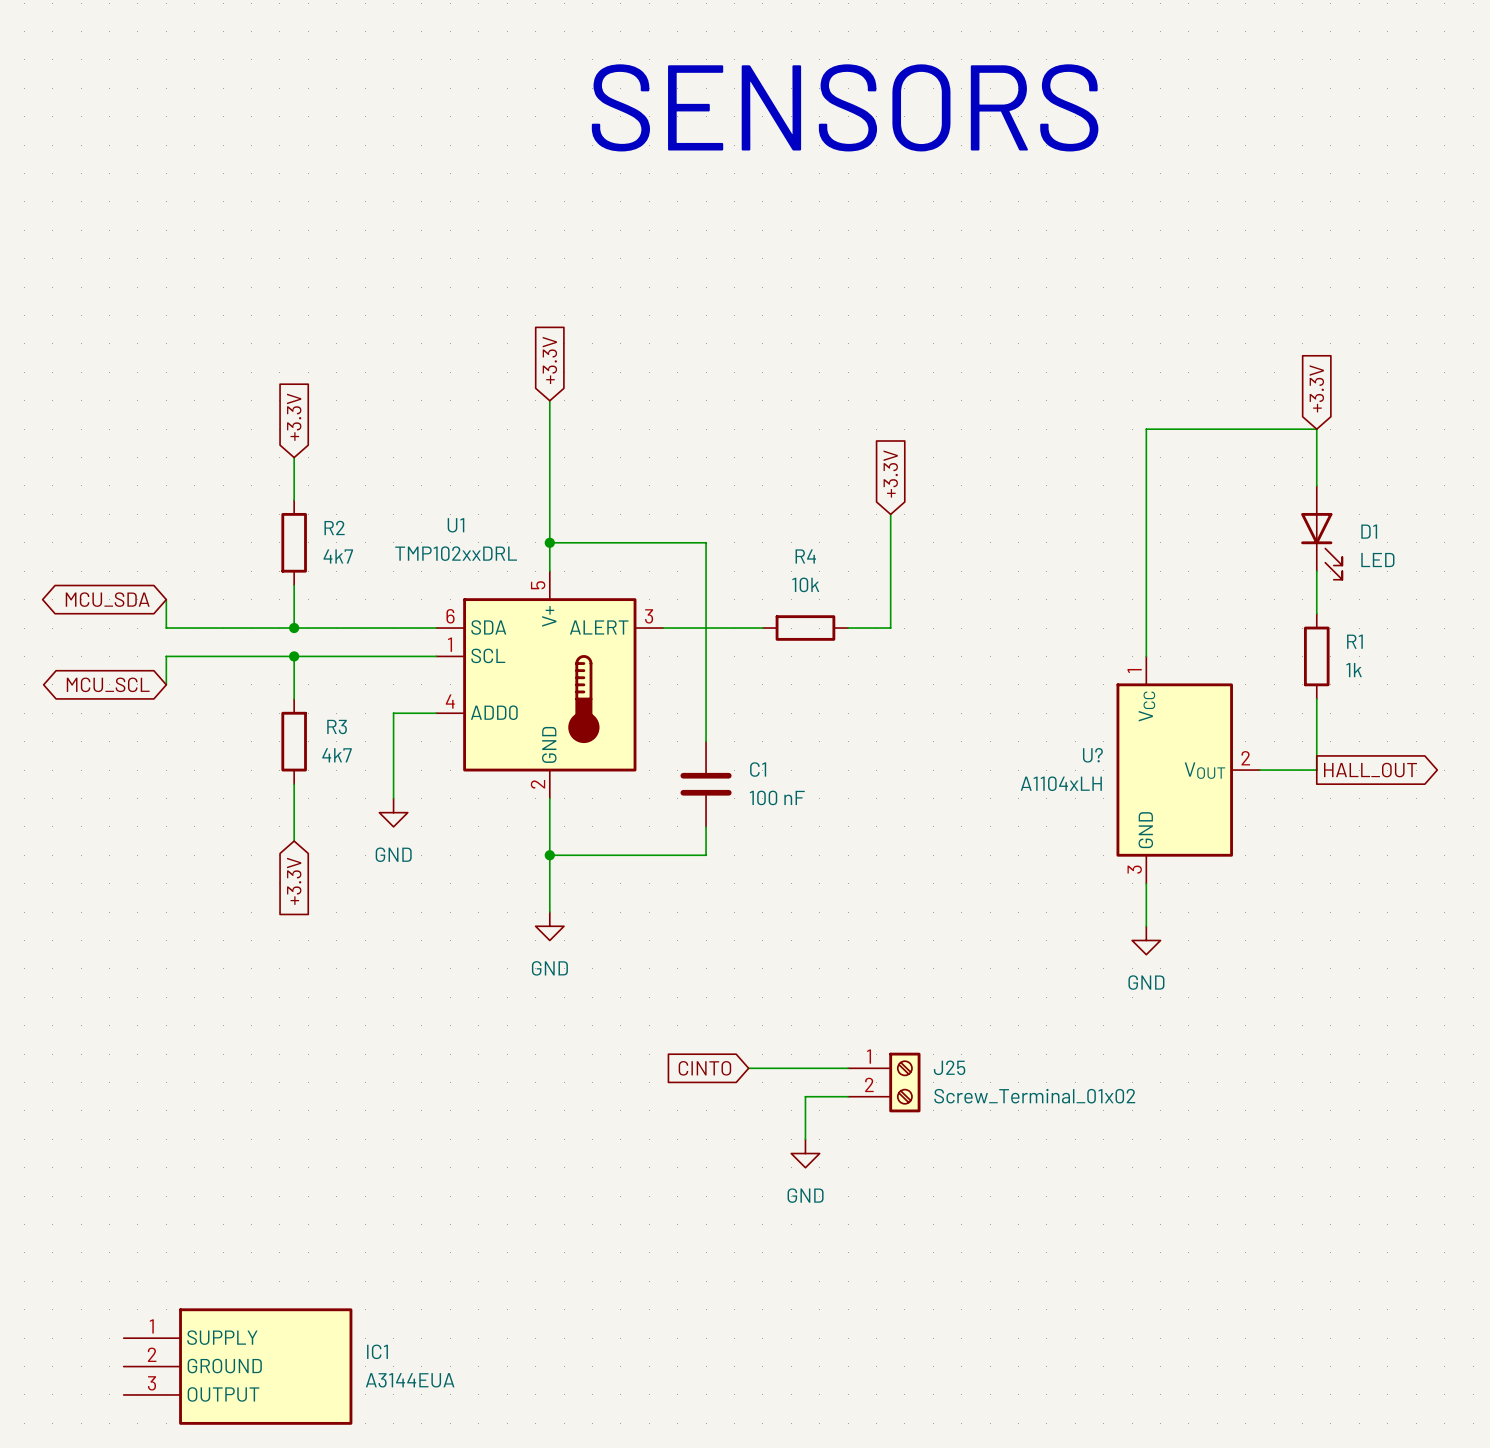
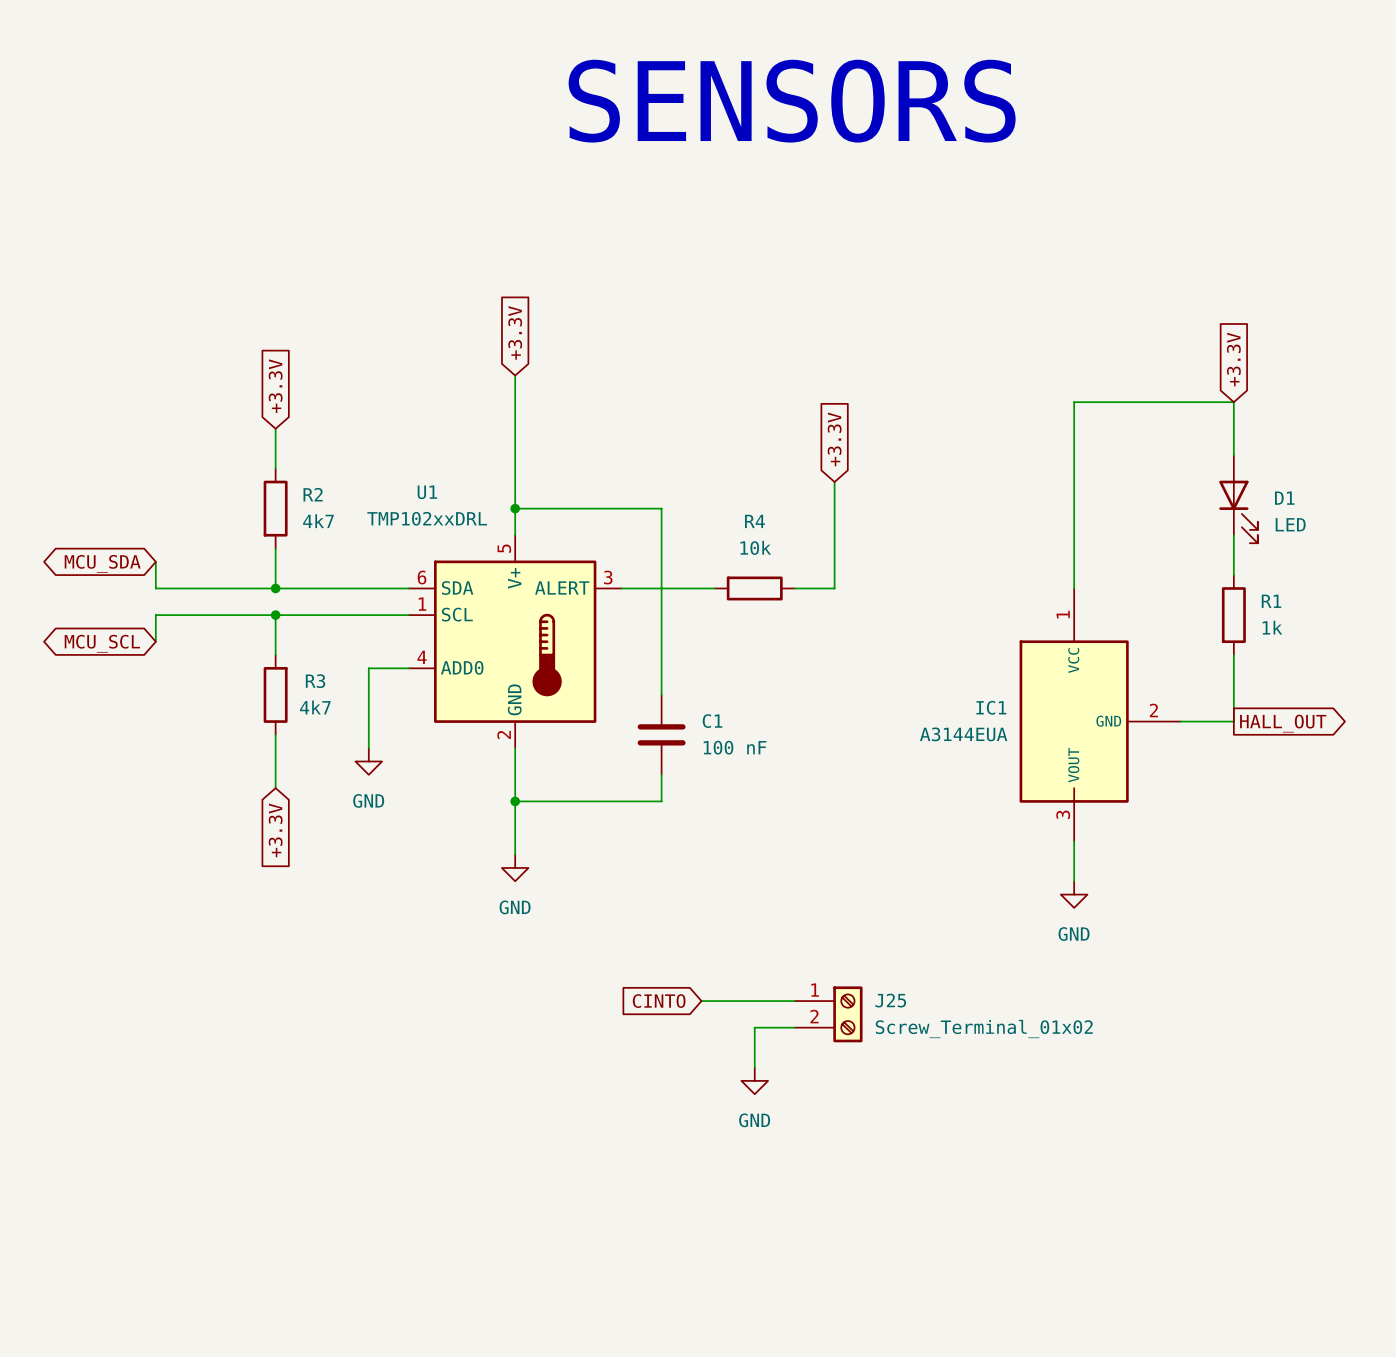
U?: A1104xLH (1188, 770) -> none
power symbol position: GND (1146, 940) -> GND (1074, 894)
IC1 symbol: [123, 1308, 353, 1425] -> [1019, 588, 1181, 842]
IC1 name position: IC1 (377, 1351) -> IC1 (991, 707)
IC1 value position: A3144EUA (410, 1380) -> A3144EUA (963, 734)

